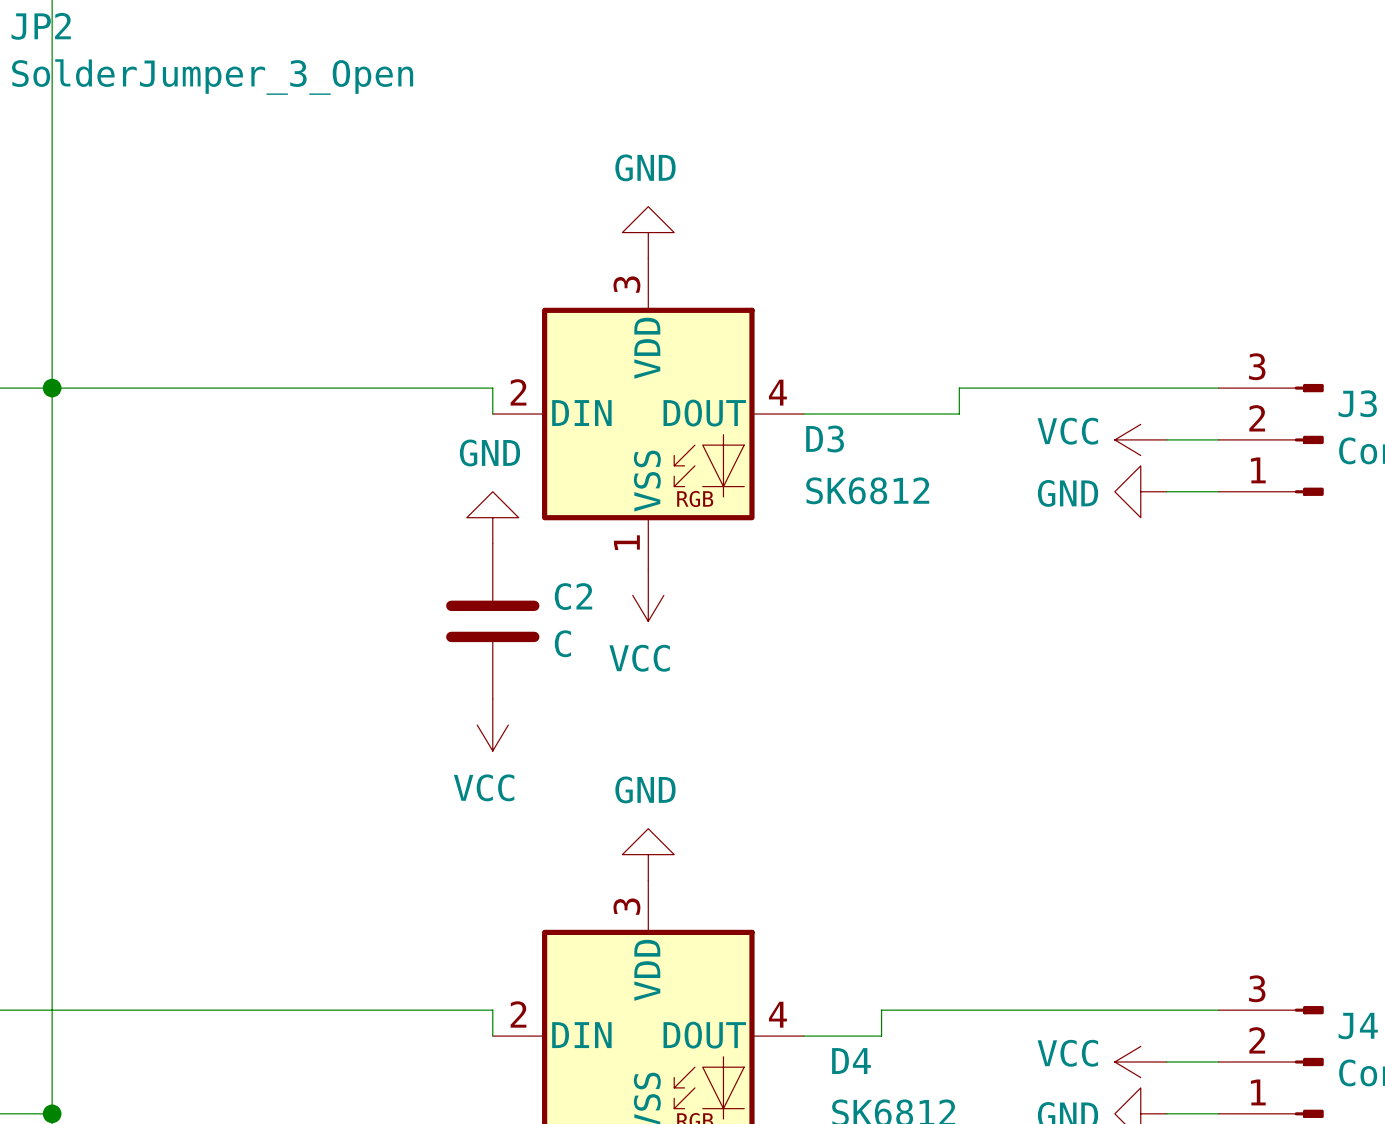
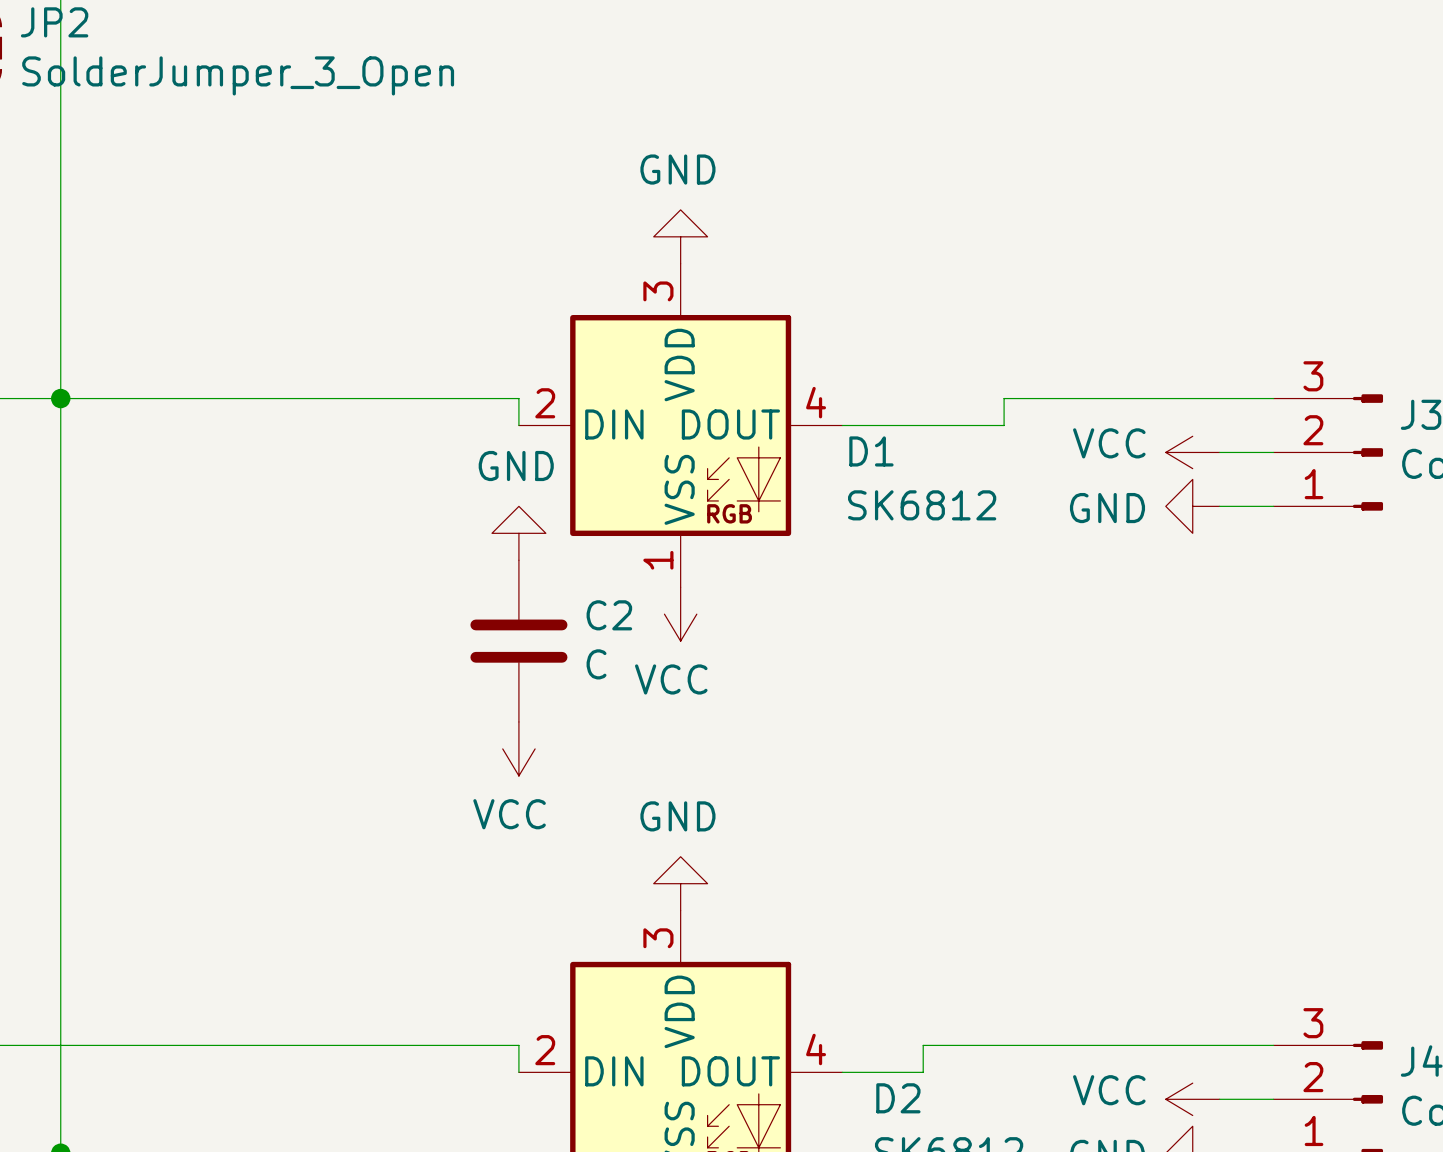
D3 name: D3 (825, 438) -> D1 (871, 451)
D4 name: D4 (851, 1061) -> D2 (898, 1098)

